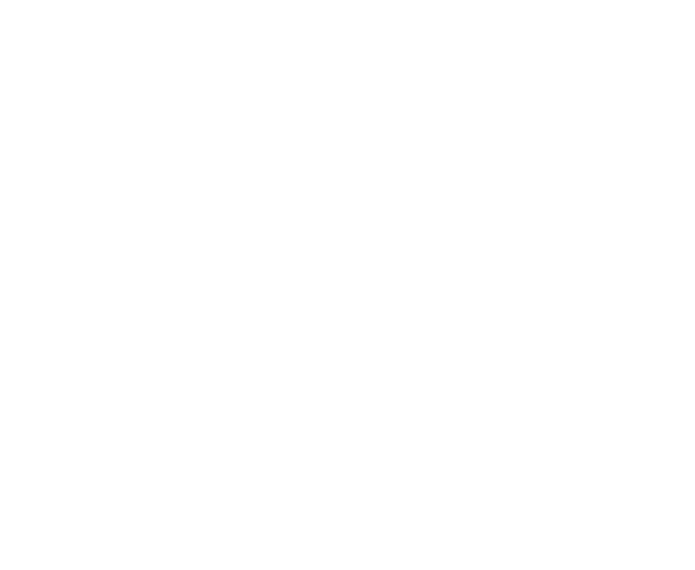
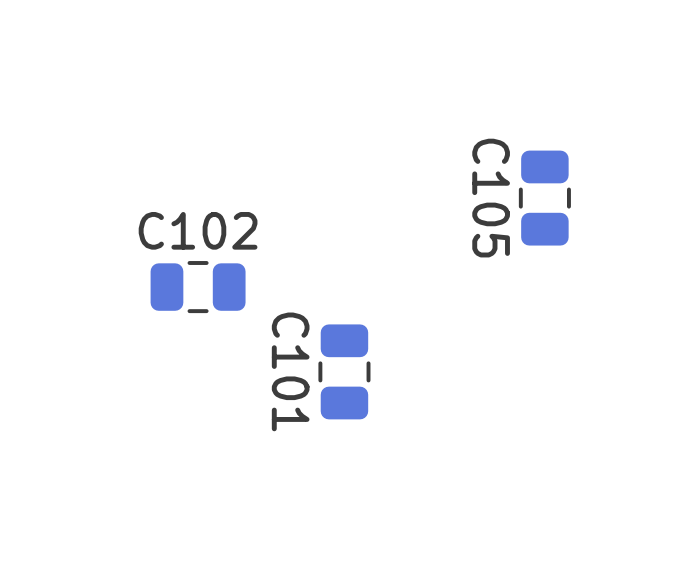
C105: none -> (544, 198)
C102: none -> (198, 287)
C101: none -> (344, 371)

